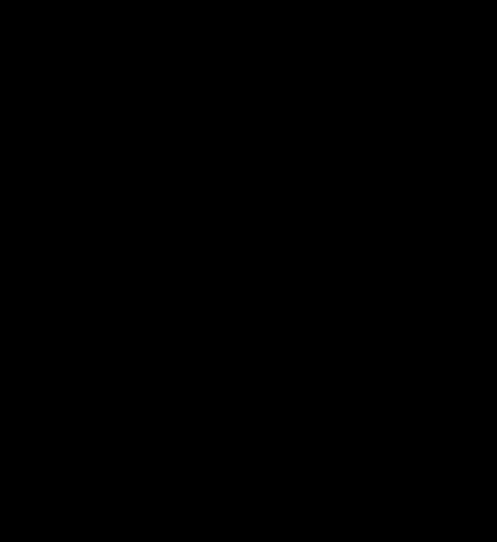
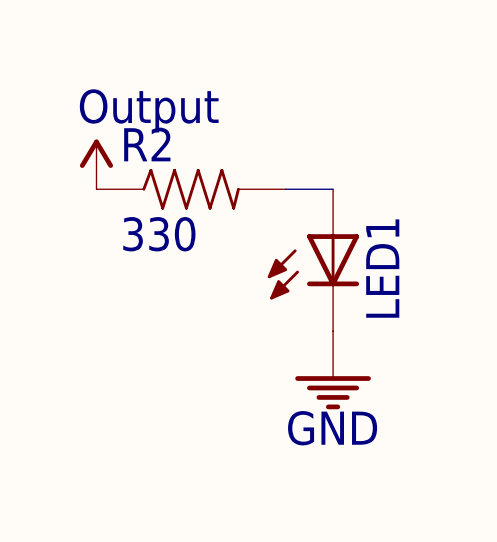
power symbol: none -> Output (96, 164)
R2: none -> 330 (191, 189)
wire: none -> (285, 189) (333, 189)
LED1: none -> (313, 260)
power symbol: none -> GND (333, 370)

